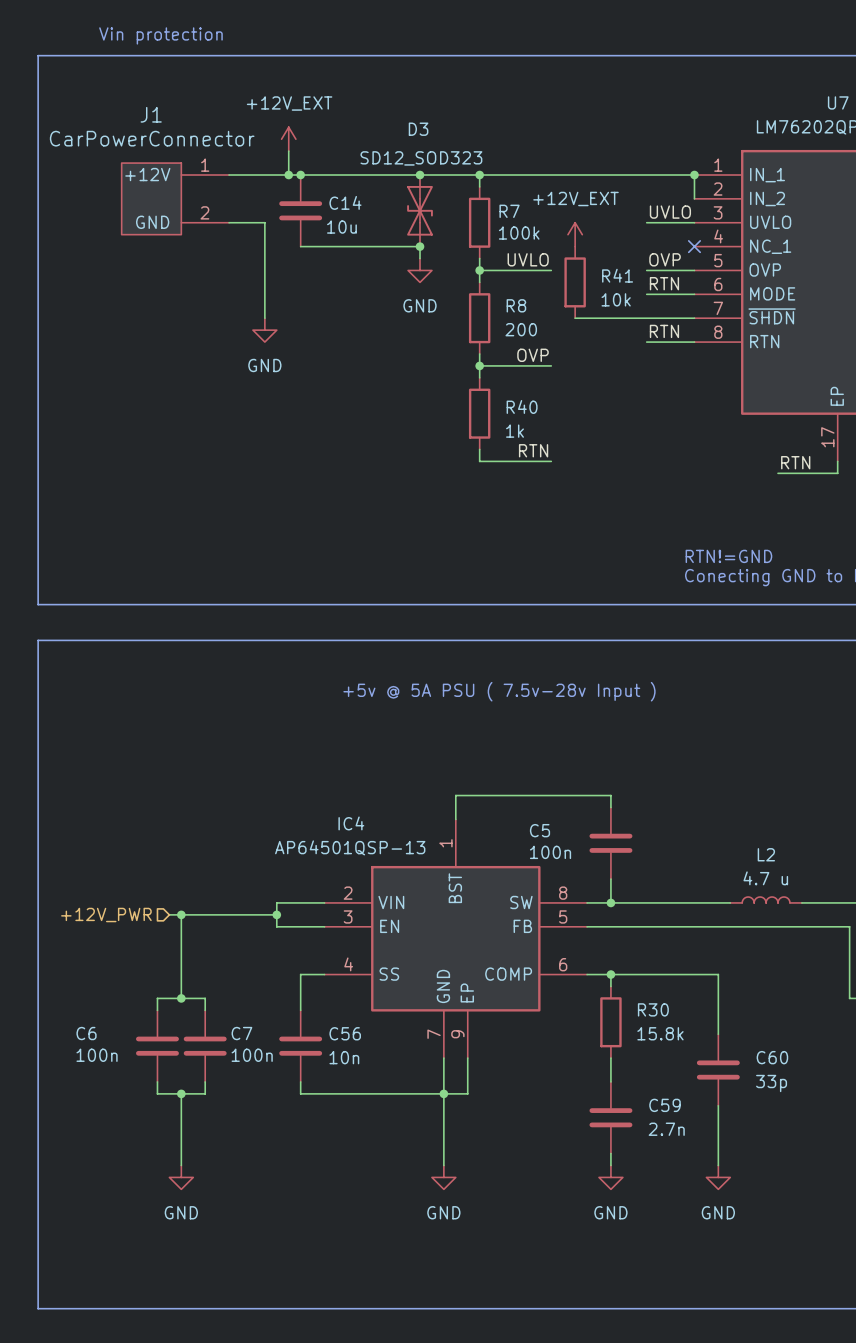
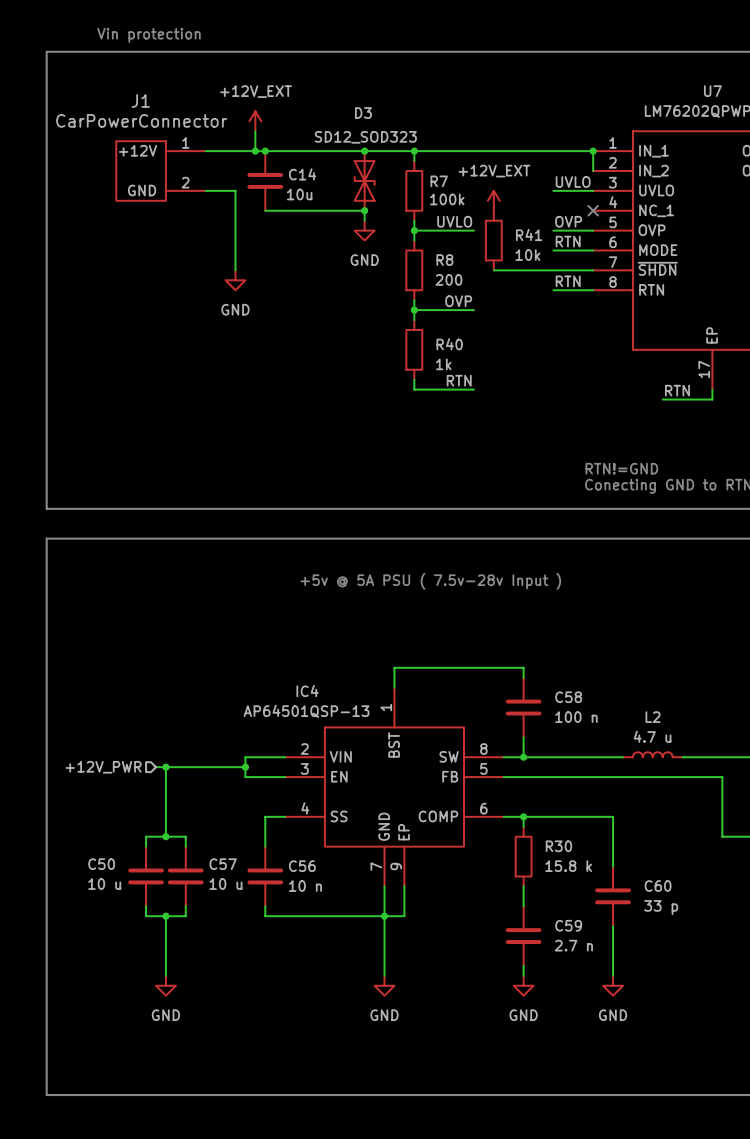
C5 name: C5 (540, 830) -> C58 (568, 697)
C5 value: 100n (550, 852) -> 100 n (576, 717)
C6 name: C6 (86, 1033) -> C50 (101, 864)
C7 name: C7 (241, 1033) -> C57 (223, 864)
R30 value: 15.8k (660, 1033) -> 15.8 k (568, 866)
C6 value: 100n (97, 1055) -> 10 u (104, 884)
C7 value: 100n (252, 1055) -> 10 u (225, 884)
C56 value: 10n (344, 1057) -> 10 n (305, 886)
C60 value: 33p (771, 1083) -> 33 p (661, 907)
C59 value: 2.7n (666, 1129) -> 2.7 n (573, 945)

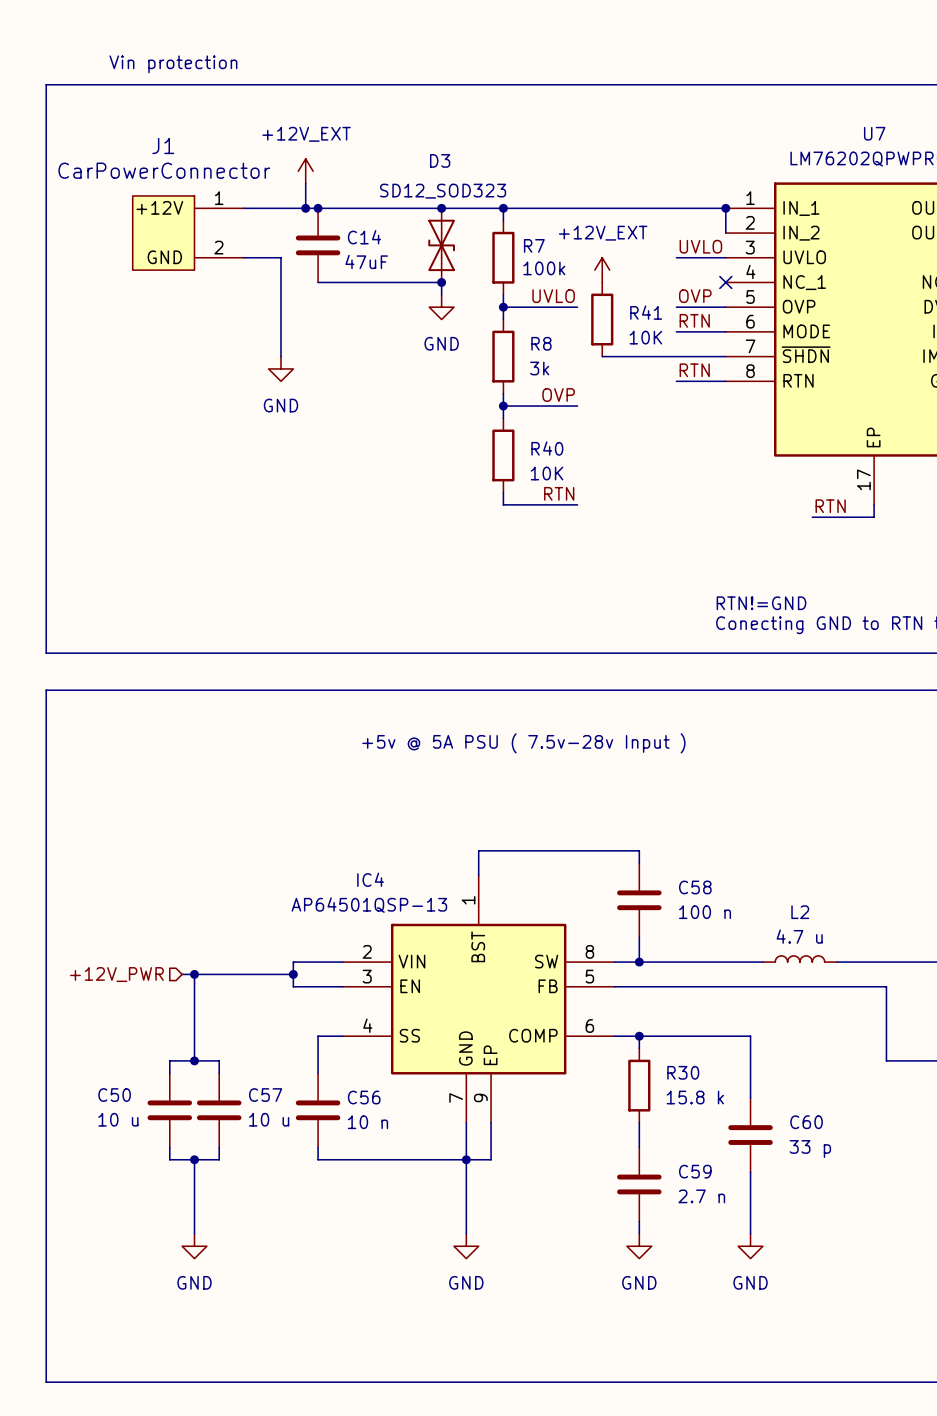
C14 value: 10u (299, 194) -> 47uF (366, 261)
R41 value: 10k (527, 255) -> 10K (645, 337)
R8 value: 200 (448, 279) -> 3k (539, 368)
R40 value: 1k (443, 364) -> 10K (547, 473)

